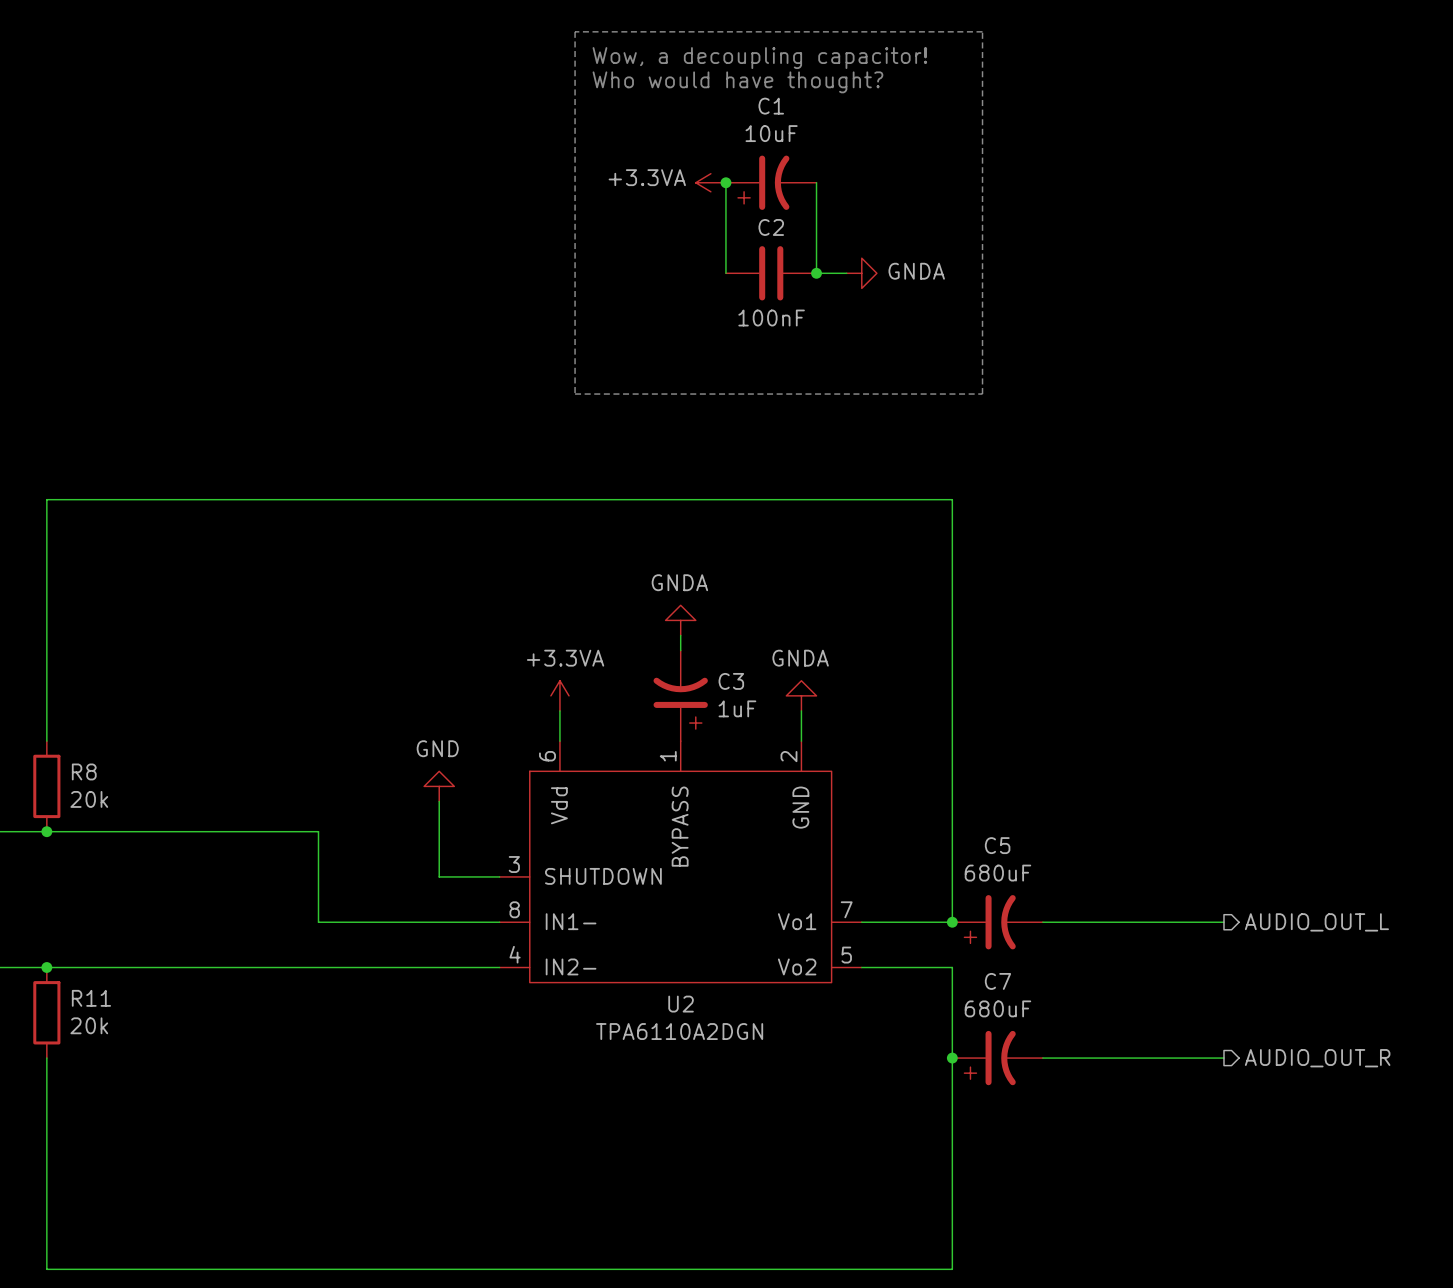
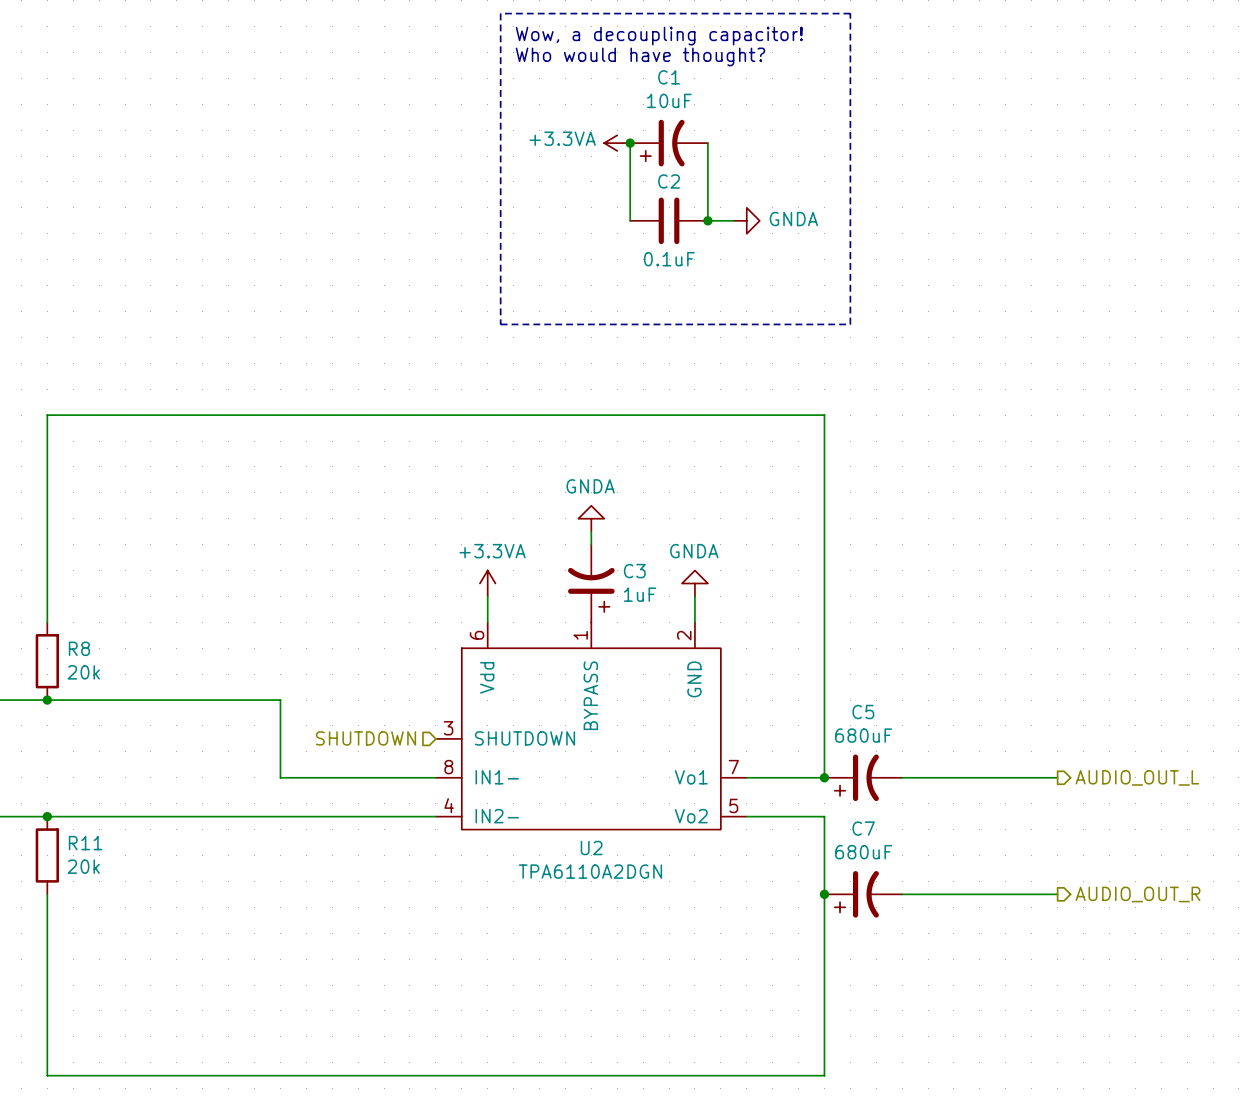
C2 value: 100nF (771, 318) -> 0.1uF (669, 259)
power symbol: GND (439, 786) -> none
wire: (439, 801) (439, 876) (499, 876) -> none
hierarchical label: none -> SHUTDOWN (366, 738)

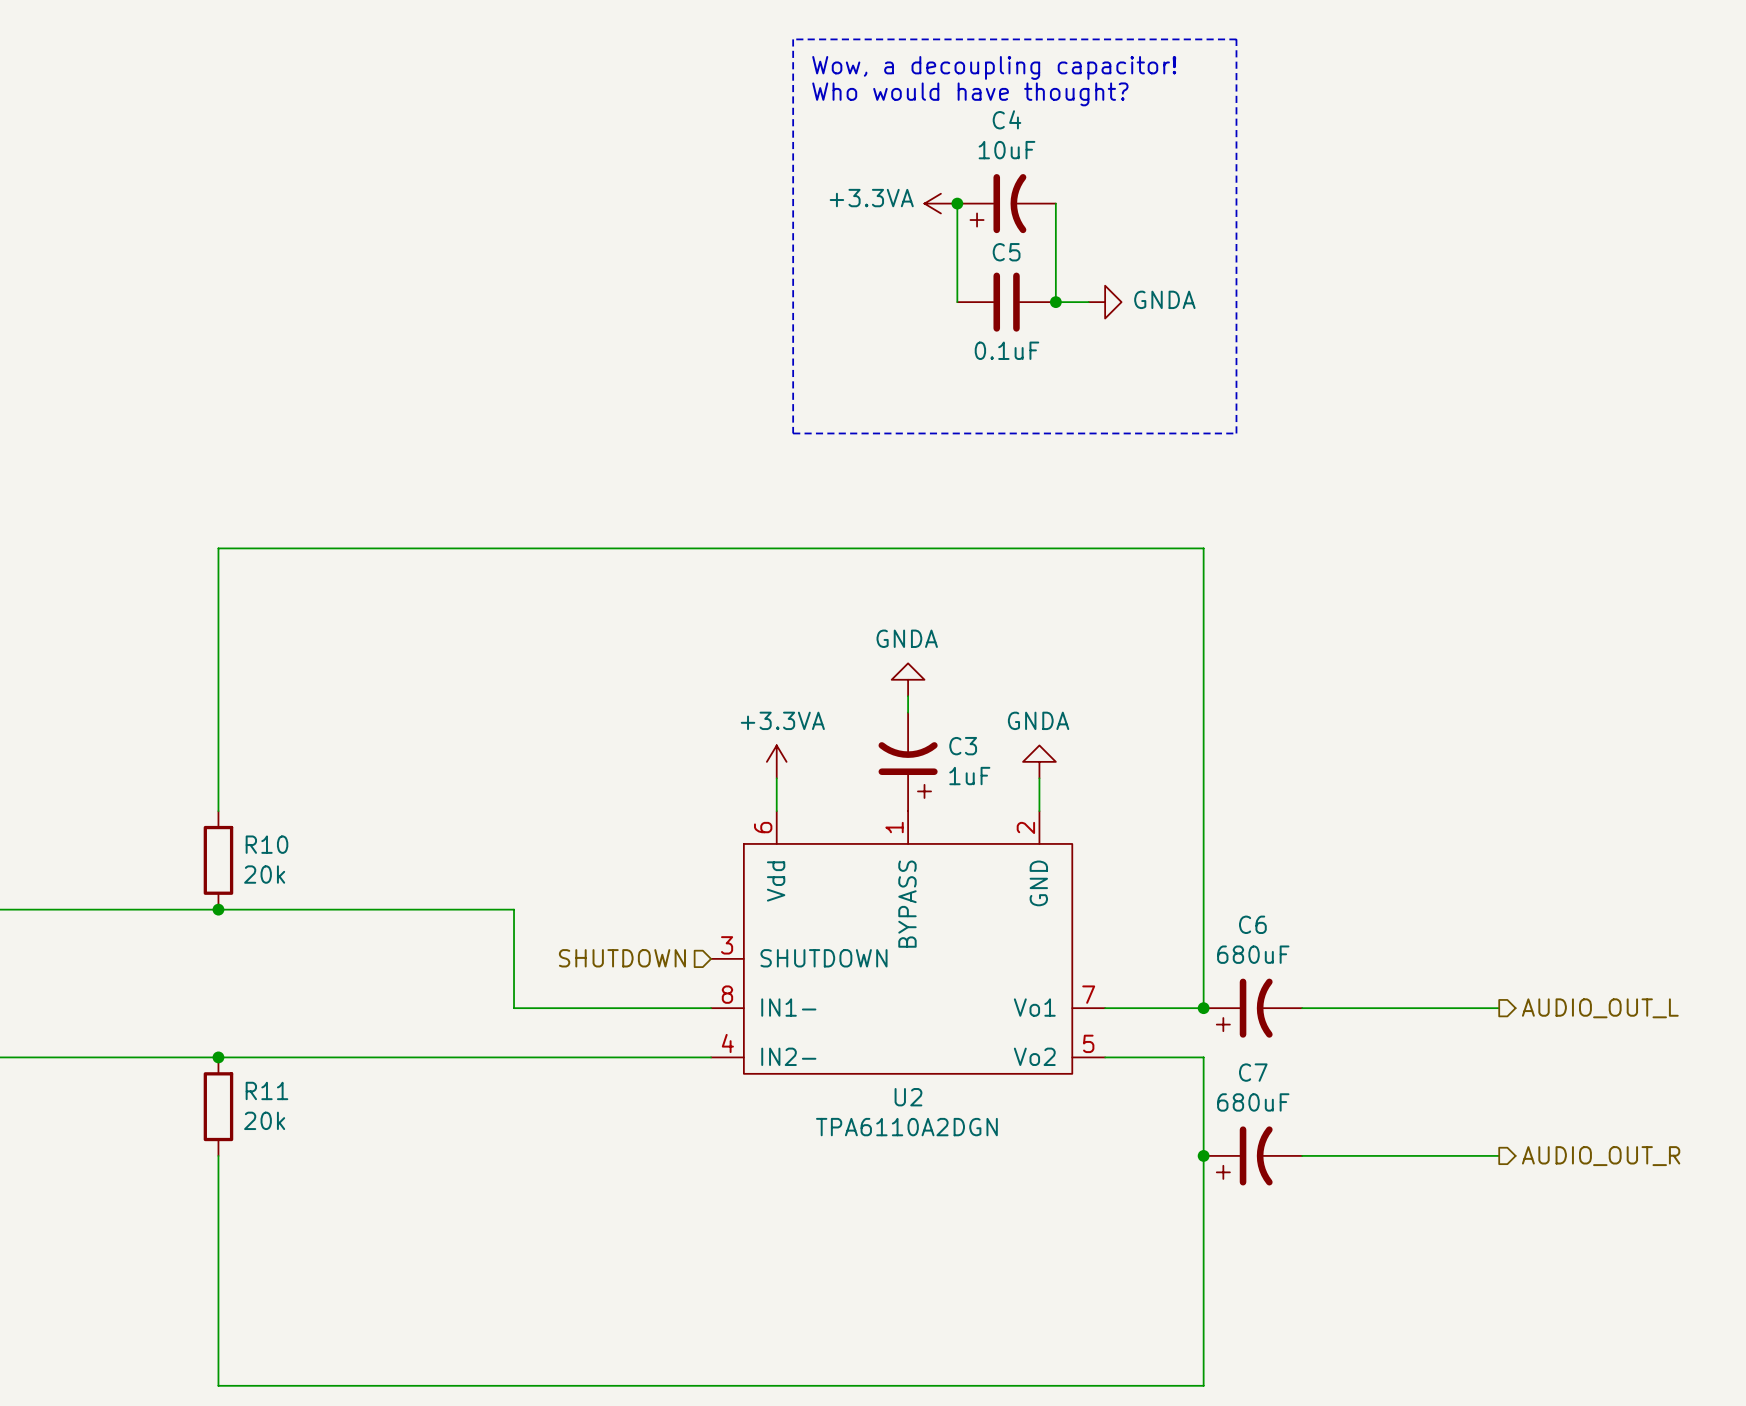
C1 name: C1 (669, 77) -> C4 (1006, 119)
C2 name: C2 (669, 181) -> C5 (1006, 252)
R8 name: R8 (79, 648) -> R10 (266, 844)
C5 name: C5 (863, 712) -> C6 (1252, 924)

